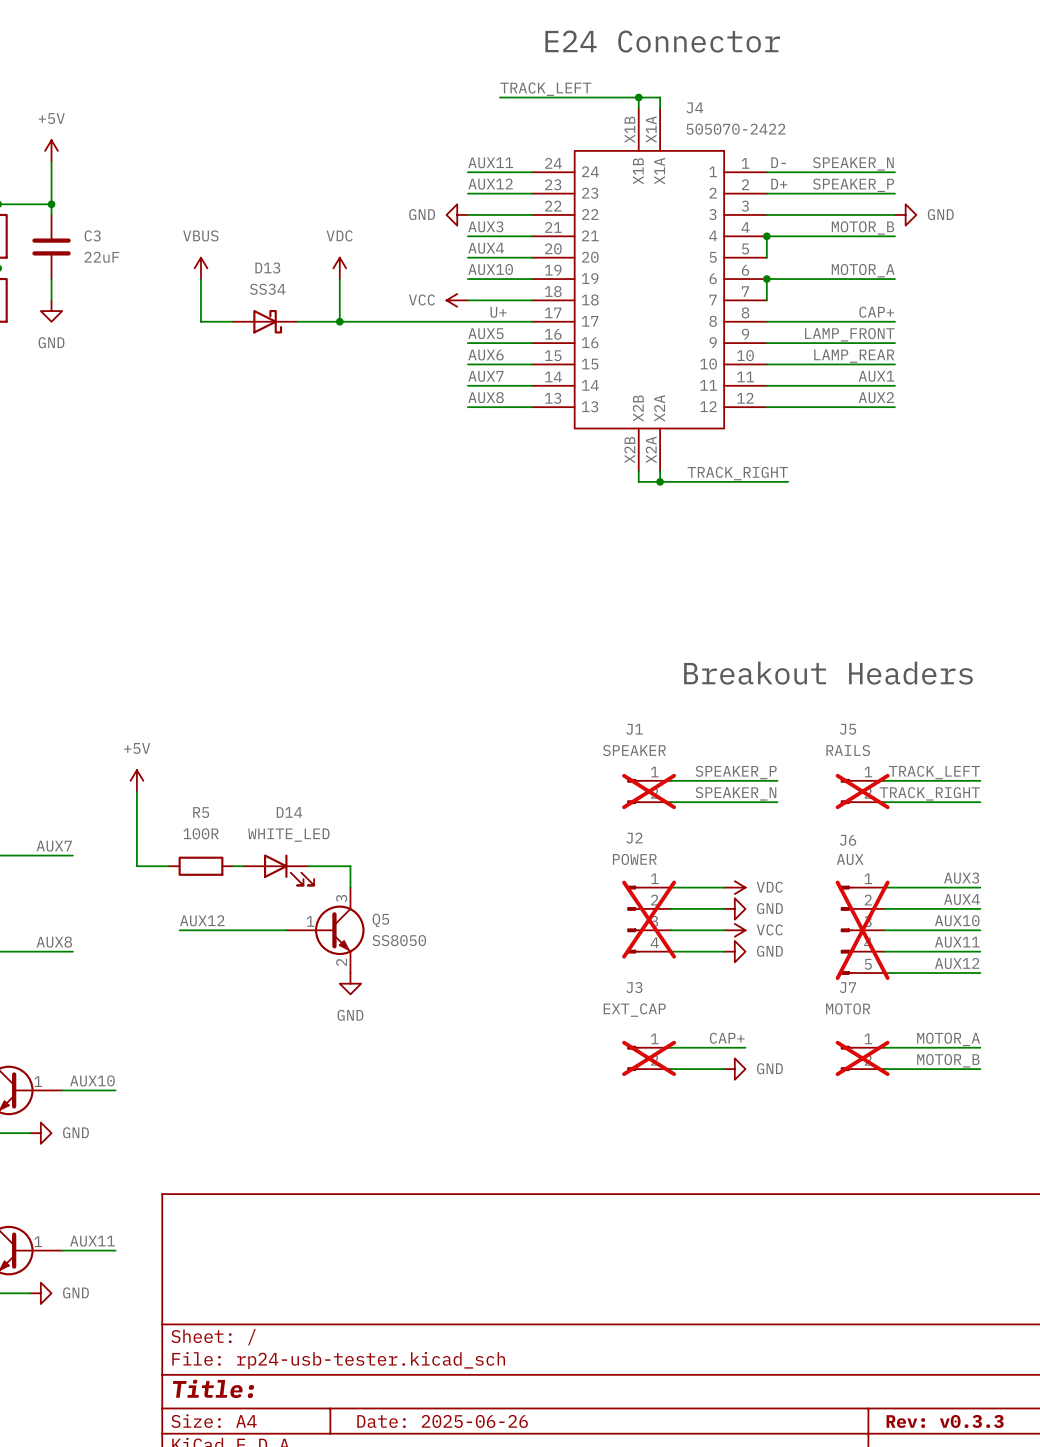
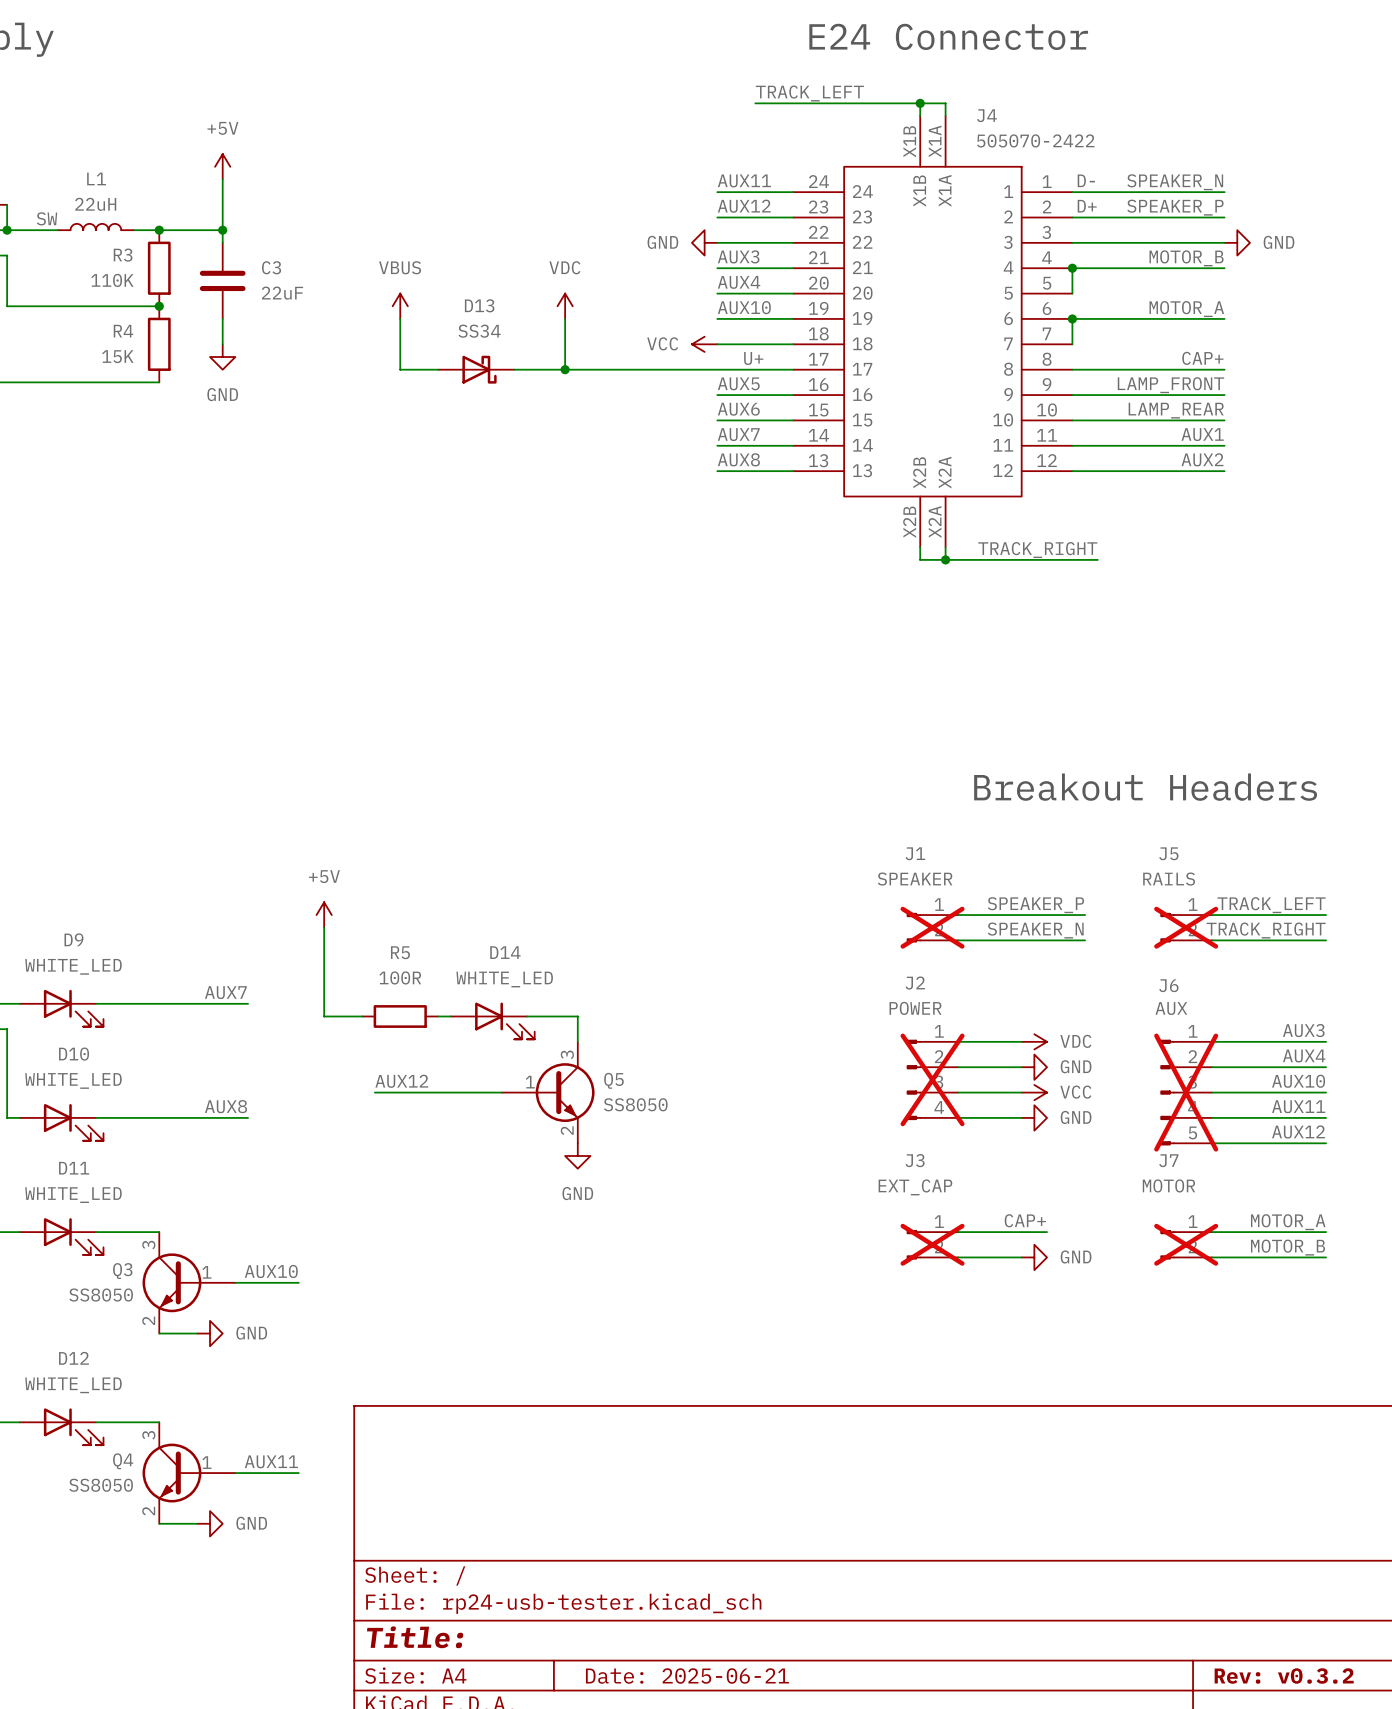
title block: Date: 2025-06-26 (442, 1421) -> Date: 2025-06-21 (687, 1676)
title block: Rev: v0.3.3 (945, 1421) -> Rev: v0.3.2 (1284, 1676)

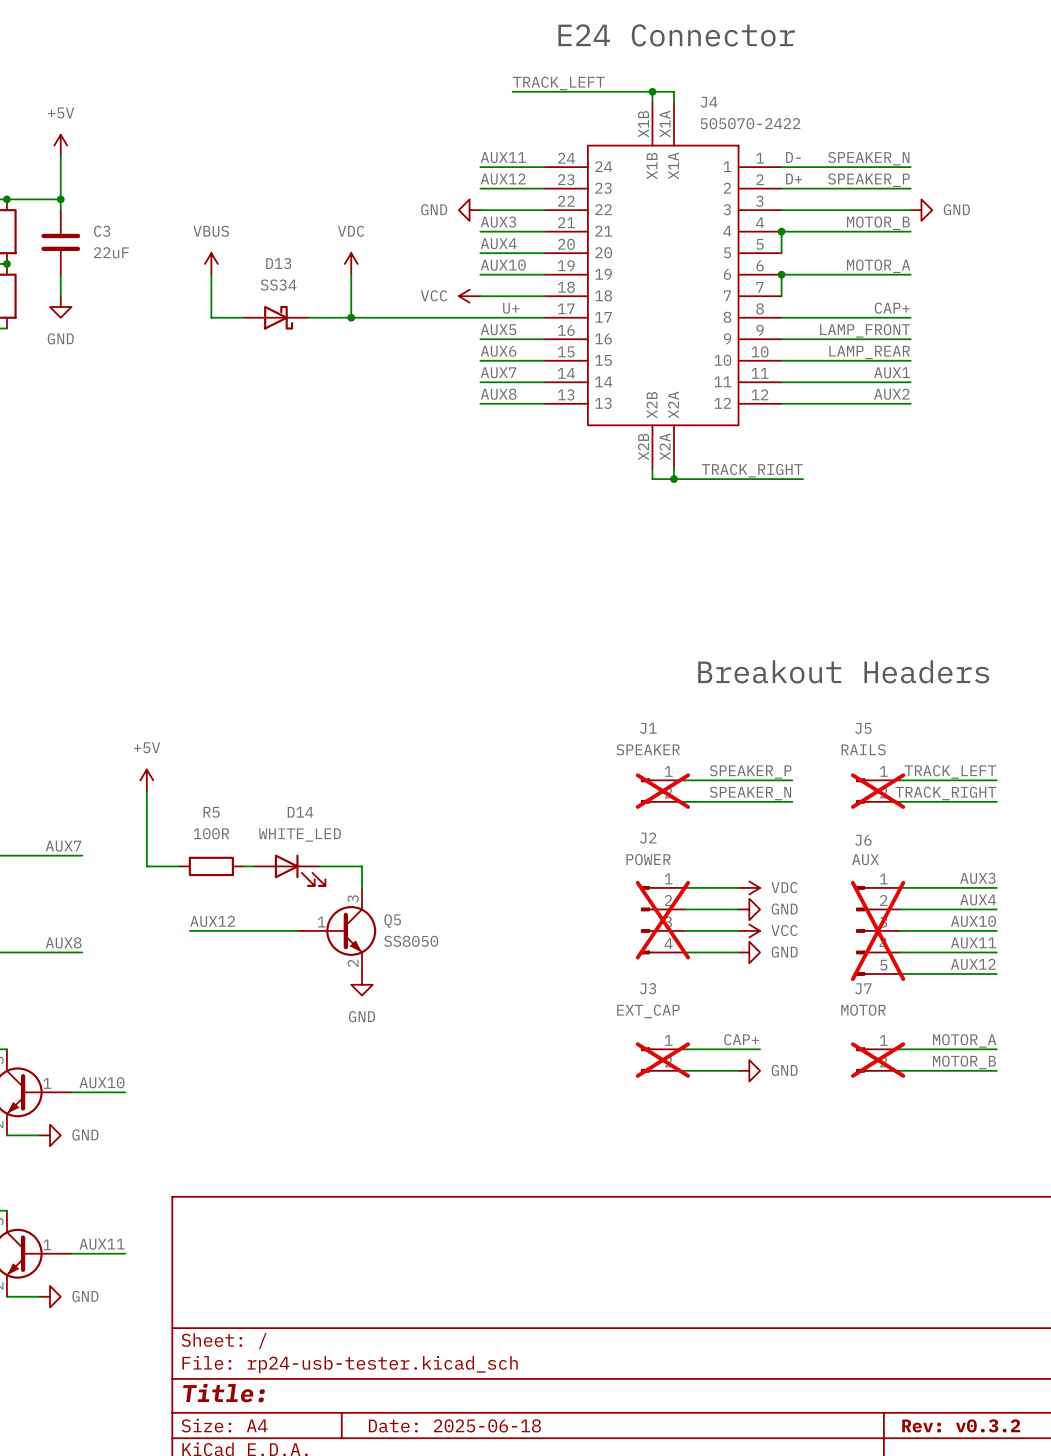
title block: Date: 2025-06-21 (687, 1676) -> Date: 2025-06-18 (454, 1425)

